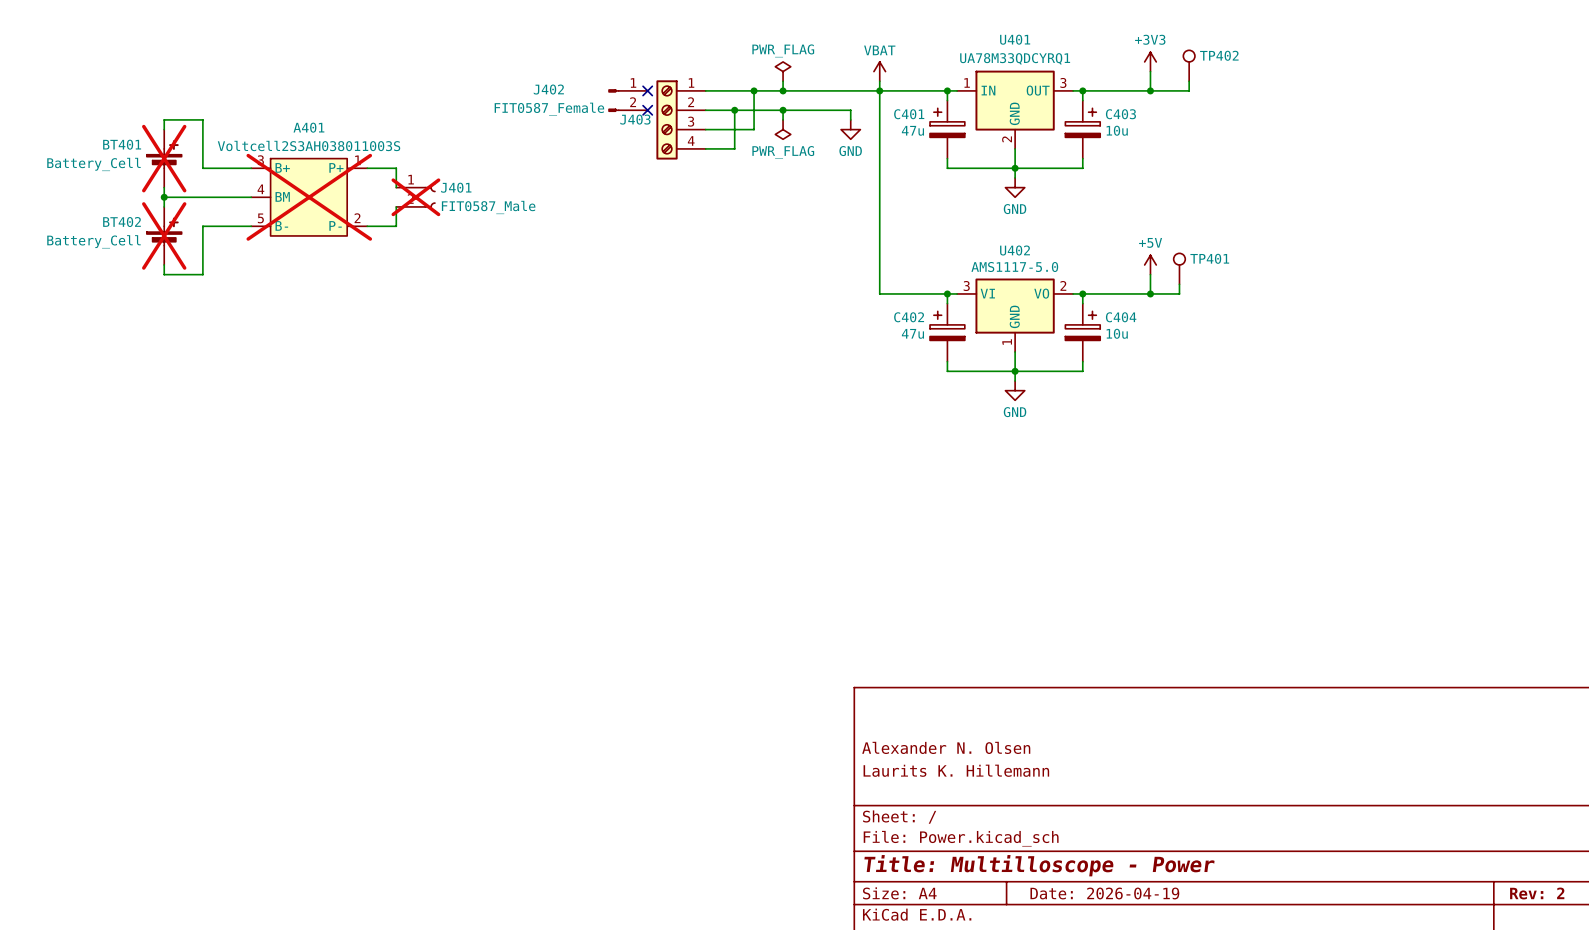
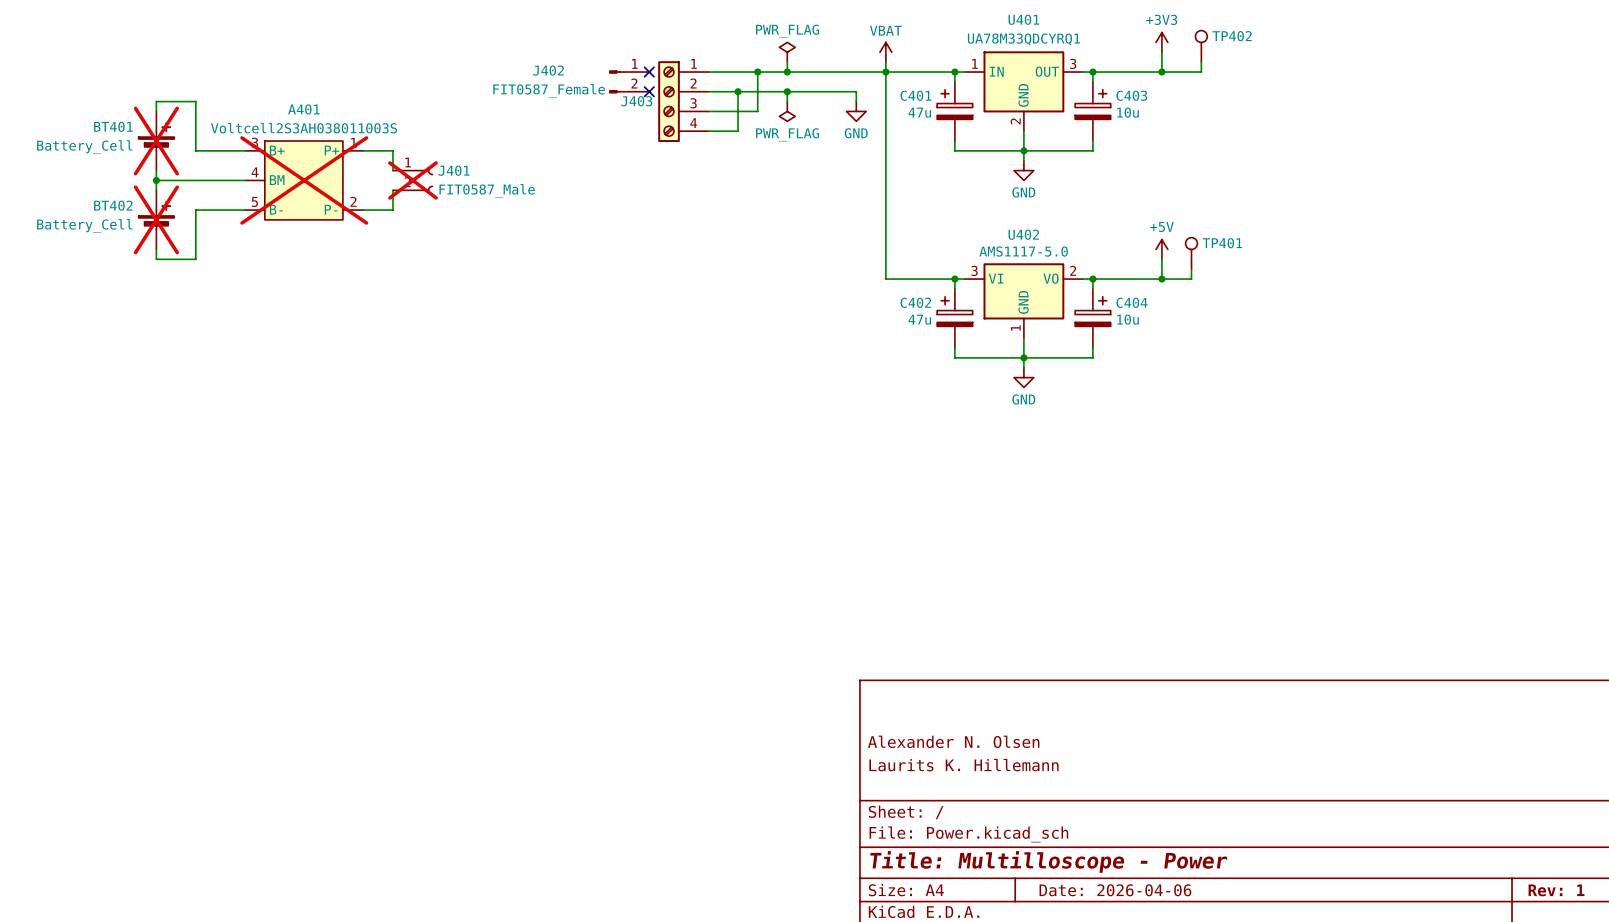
title block: Date: 2026-04-19 (1104, 893) -> Date: 2026-04-06 (1115, 890)
title block: Rev: 2 (1537, 893) -> Rev: 1 (1556, 890)

